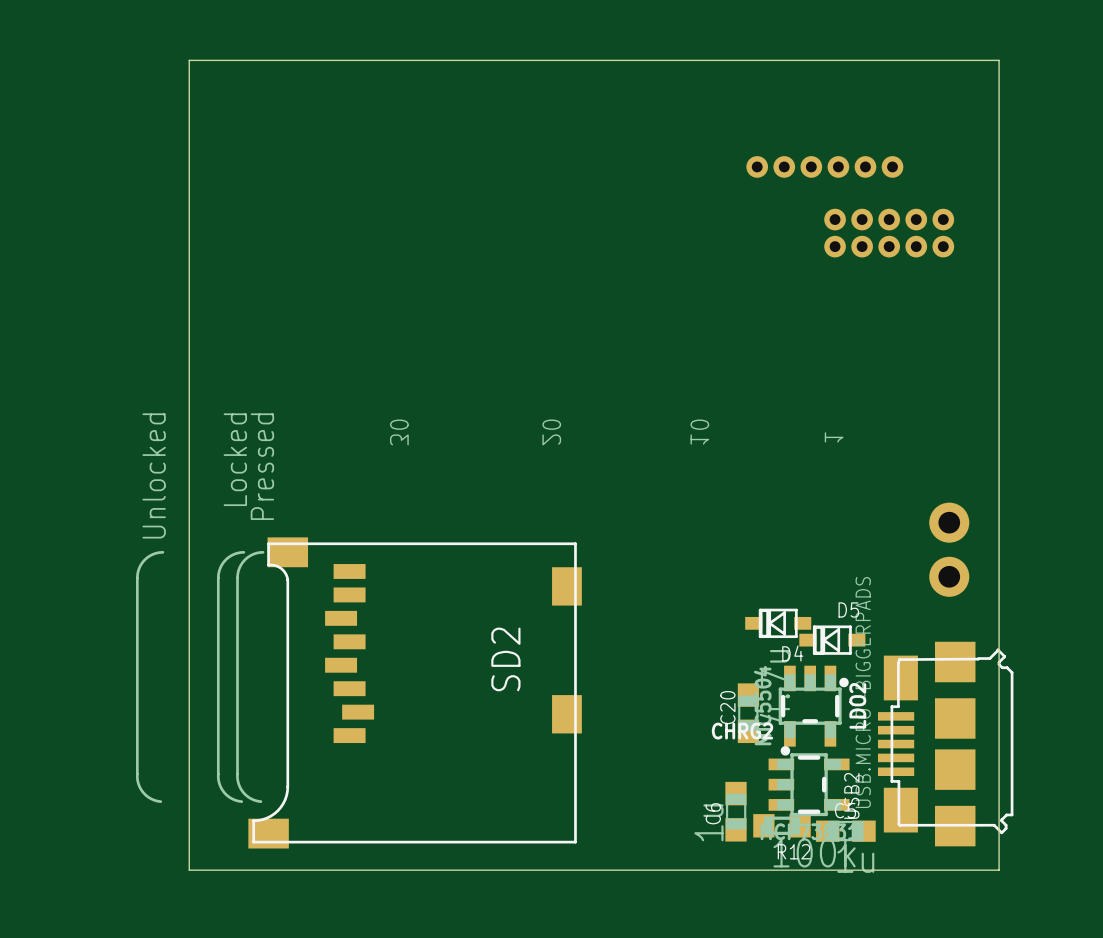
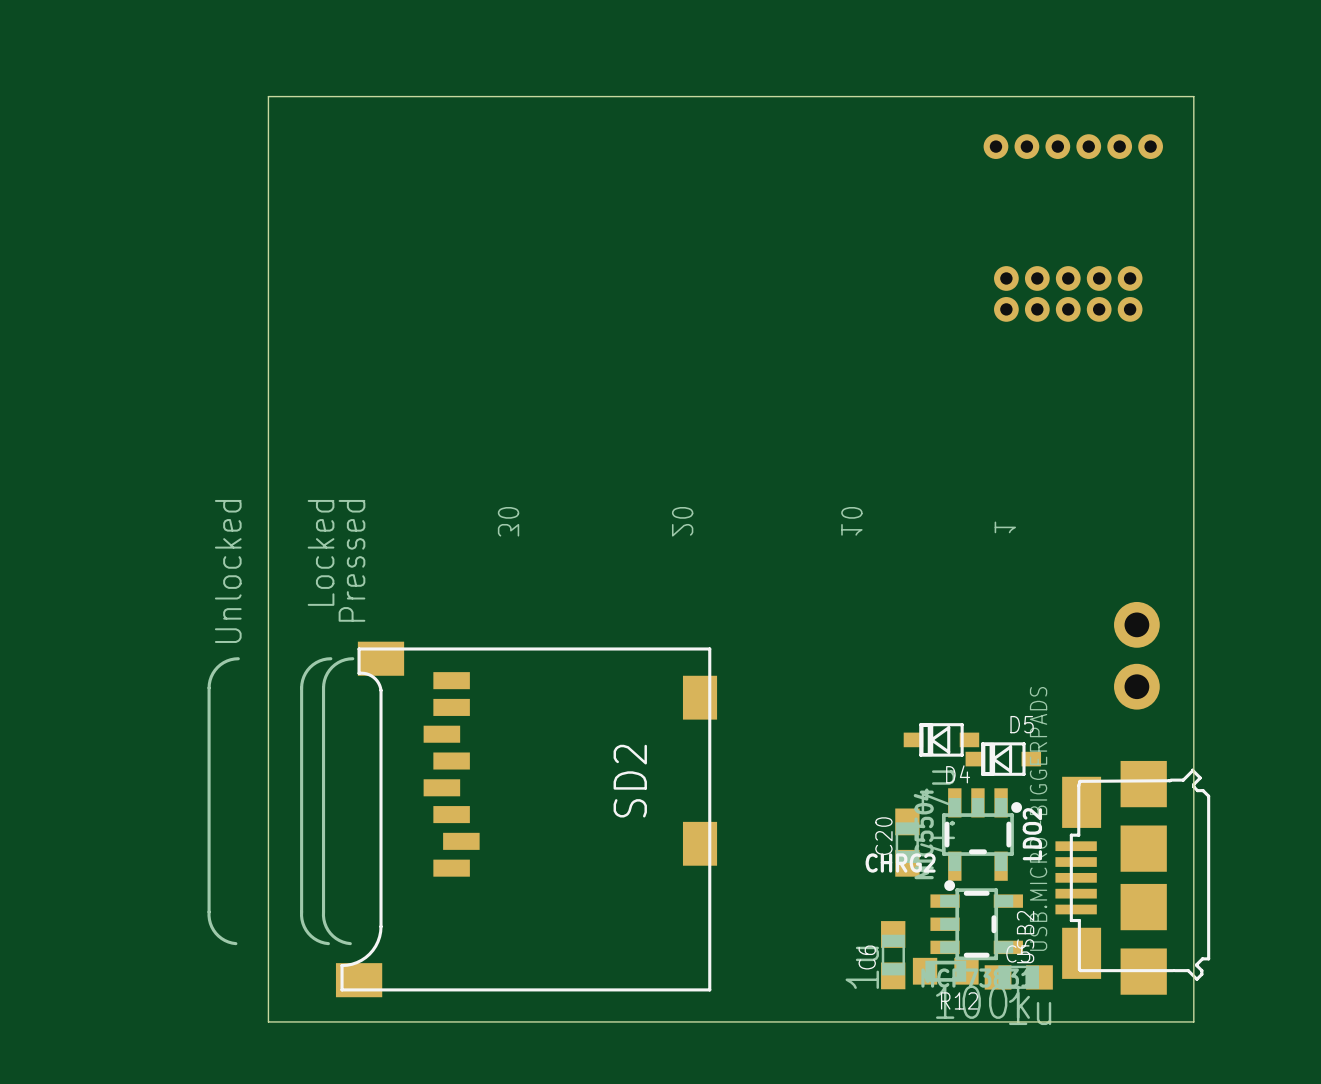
part position: (824, 166) -> (1073, 146)

